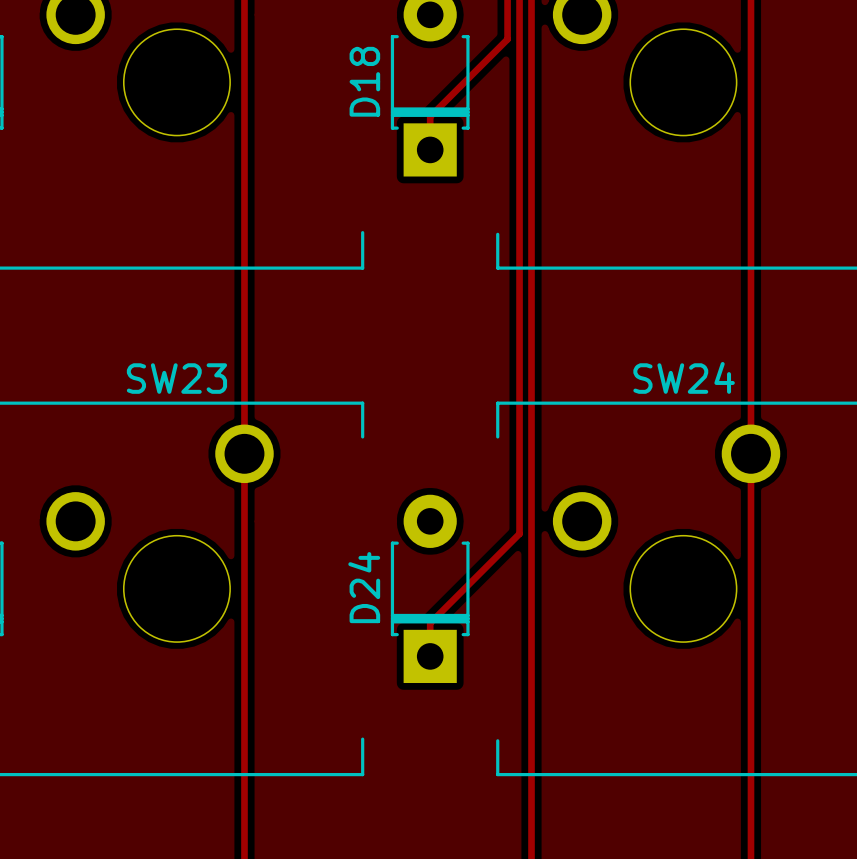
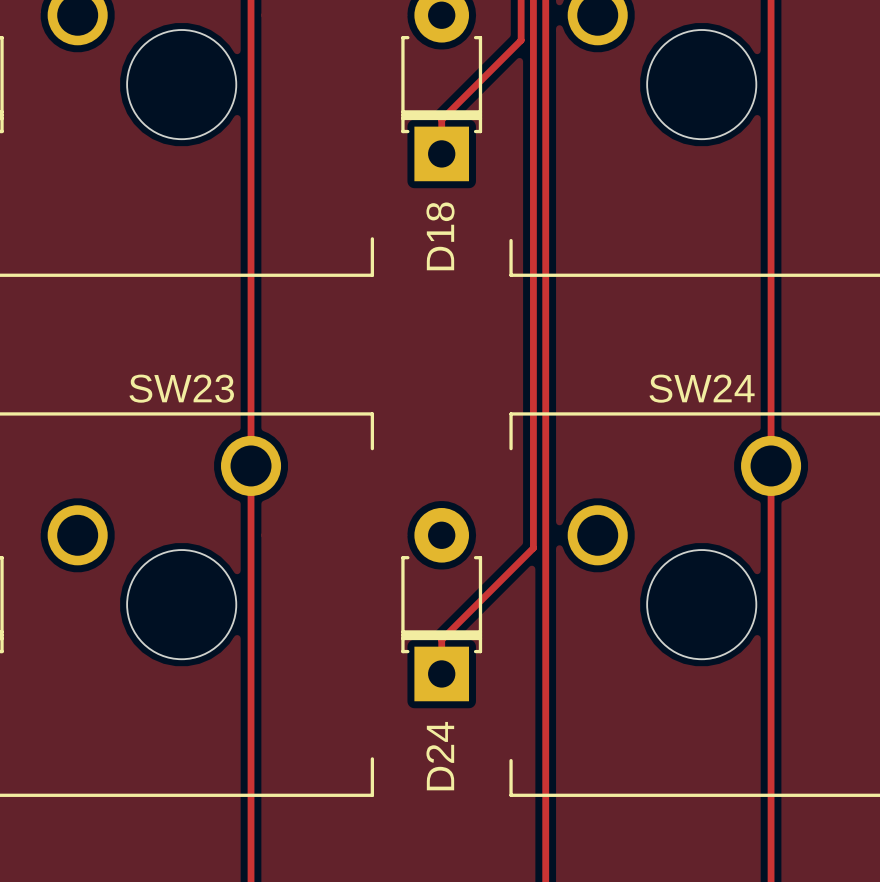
D18 name position: D18 (364, 81) -> D18 (440, 236)
D24 name position: D24 (364, 587) -> D24 (440, 756)

